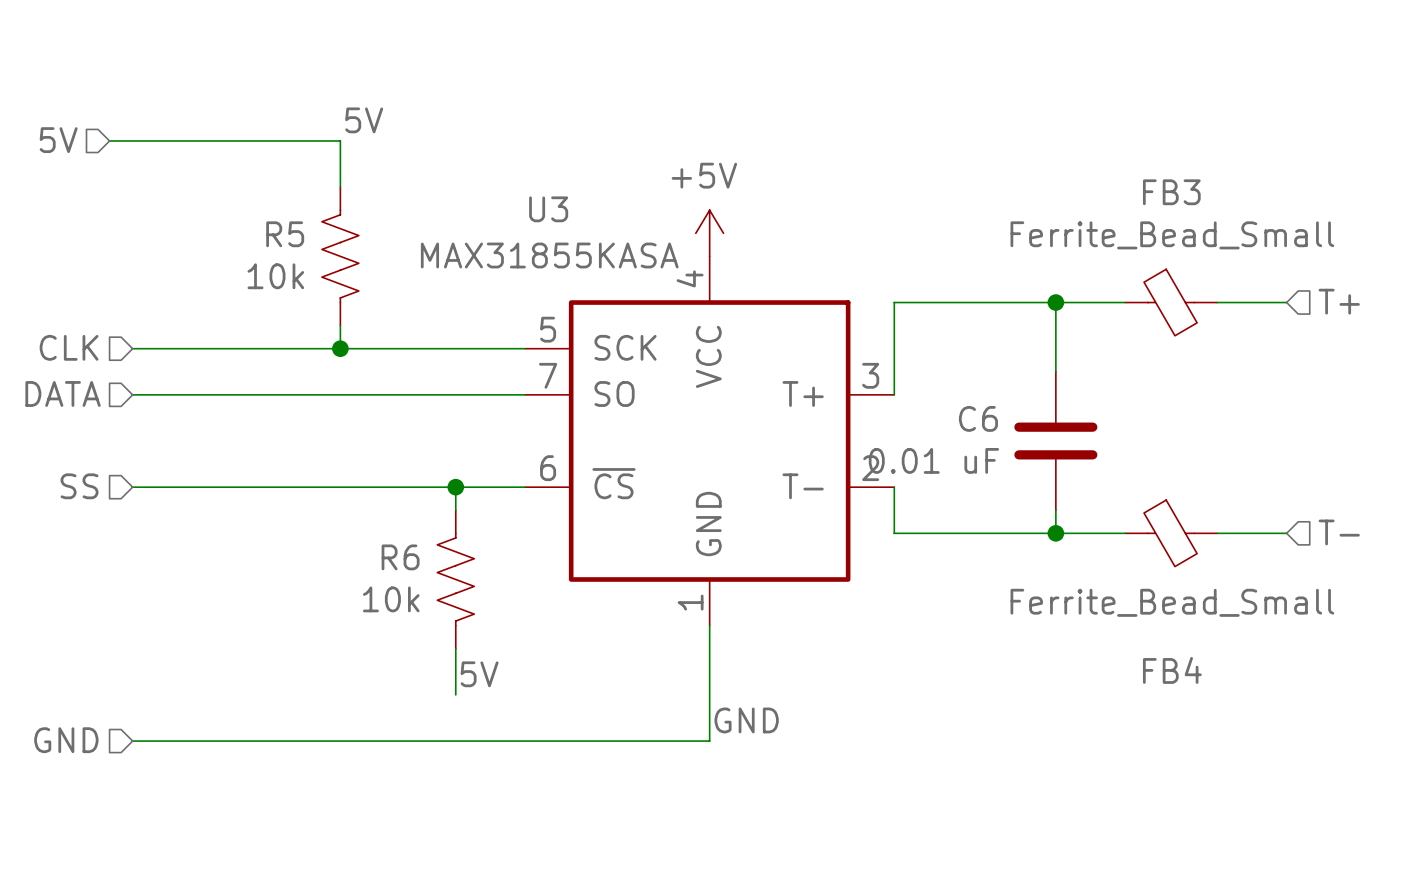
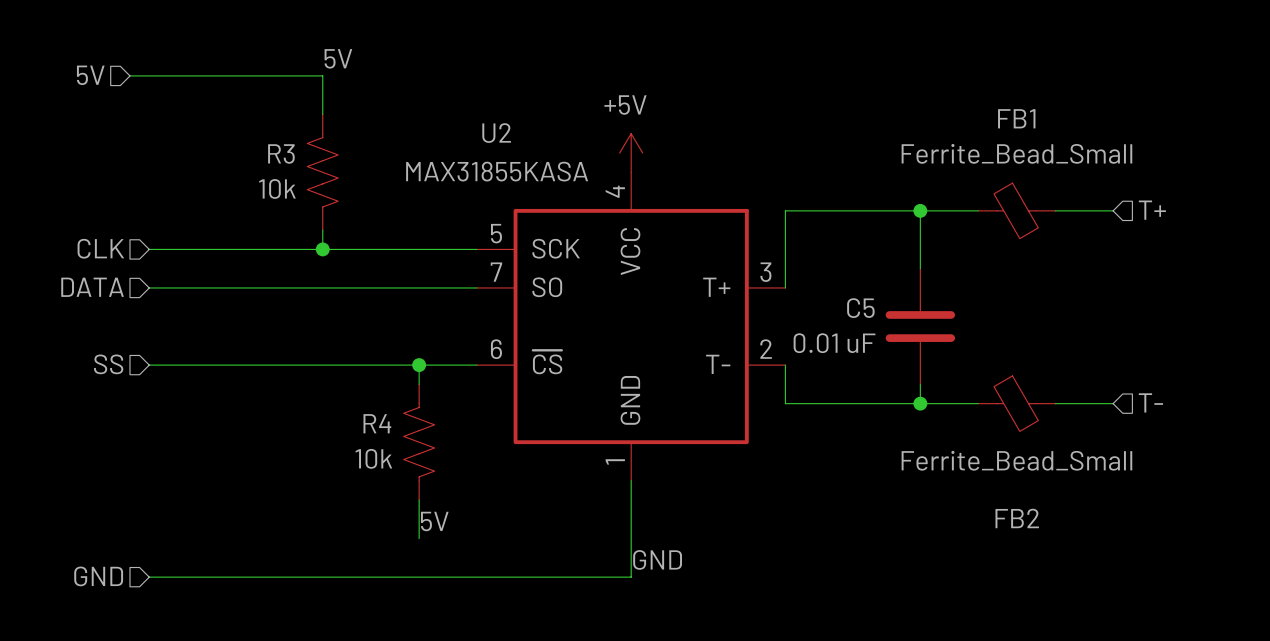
FB3 name: FB3 (1171, 192) -> FB1 (1016, 118)
U3 name: U3 (548, 209) -> U2 (496, 133)
R5 name: R5 (285, 234) -> R3 (281, 153)
C6 name: C6 (978, 418) -> C5 (860, 308)
R6 name: R6 (400, 557) -> R4 (377, 423)
FB4 name: FB4 (1172, 670) -> FB2 (1017, 518)

